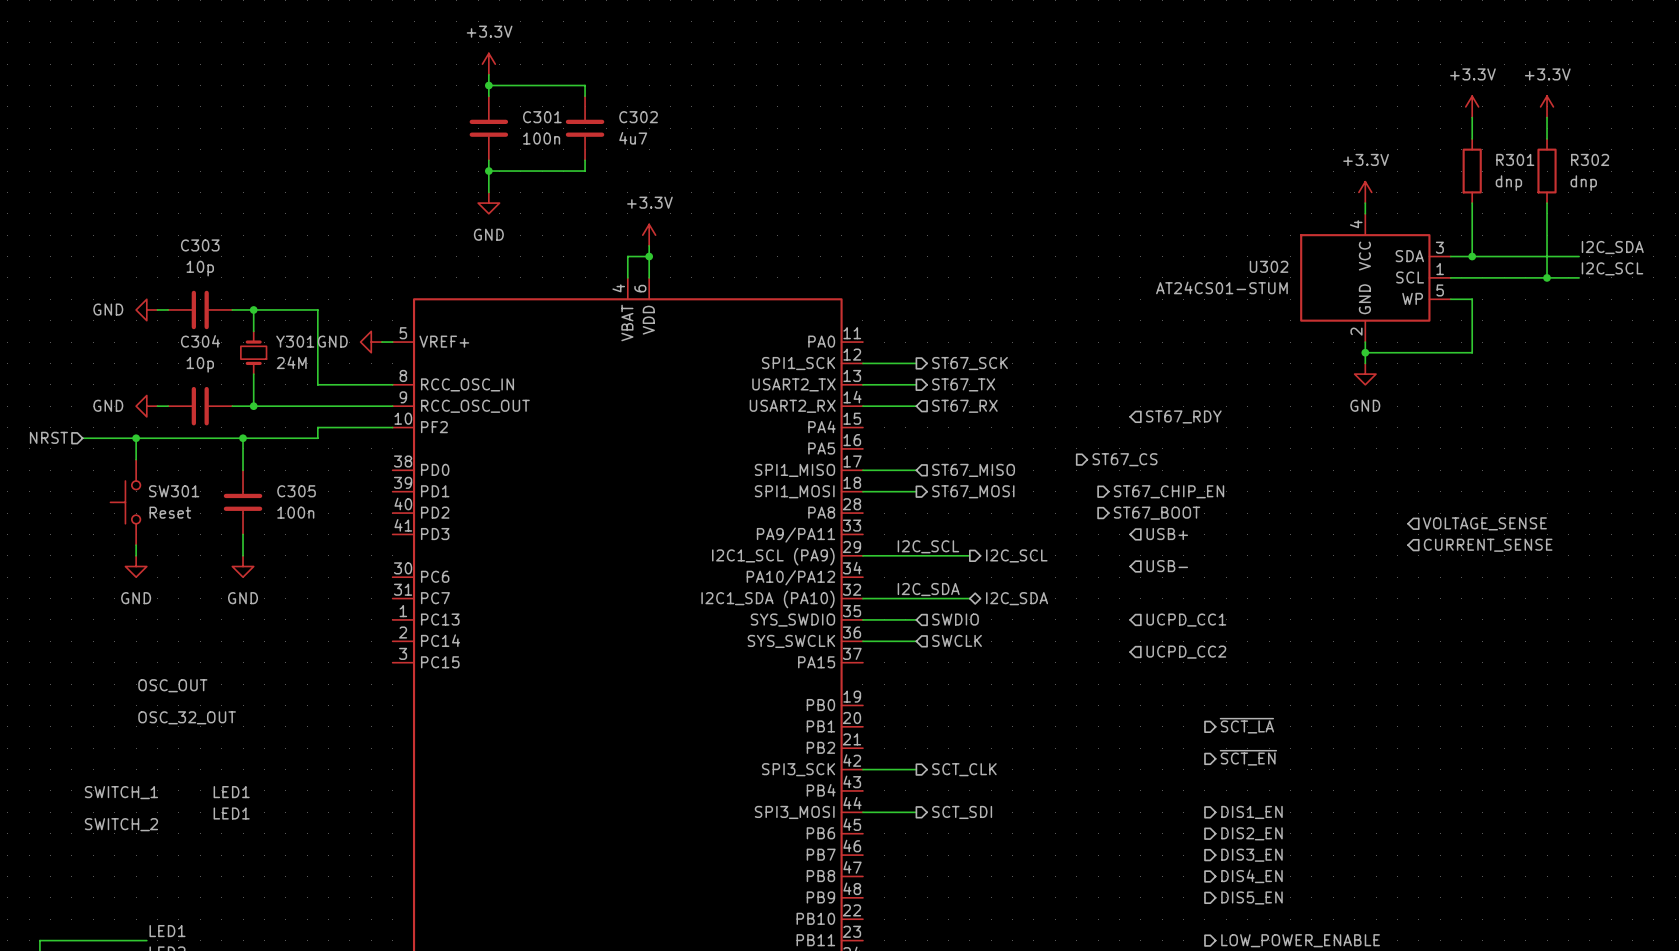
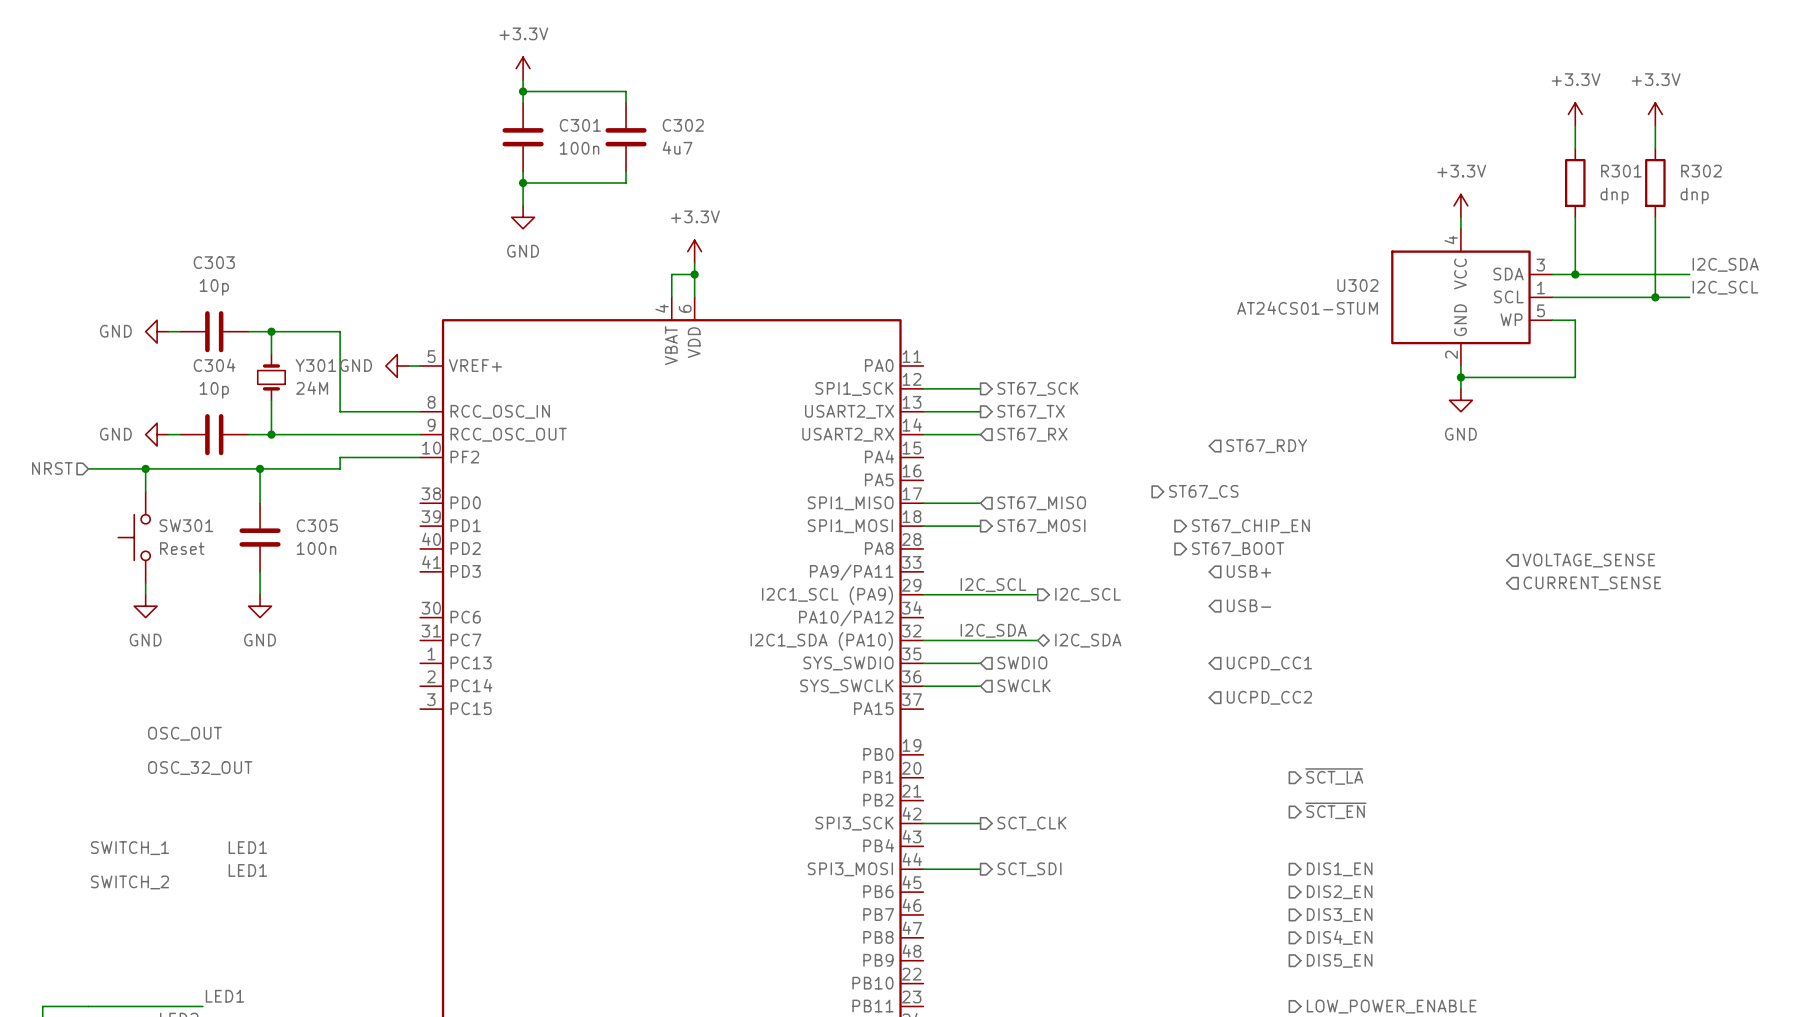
label position: LED1 (167, 931) -> LED1 (224, 996)
wire: none -> (157, 1006) (202, 1006)

